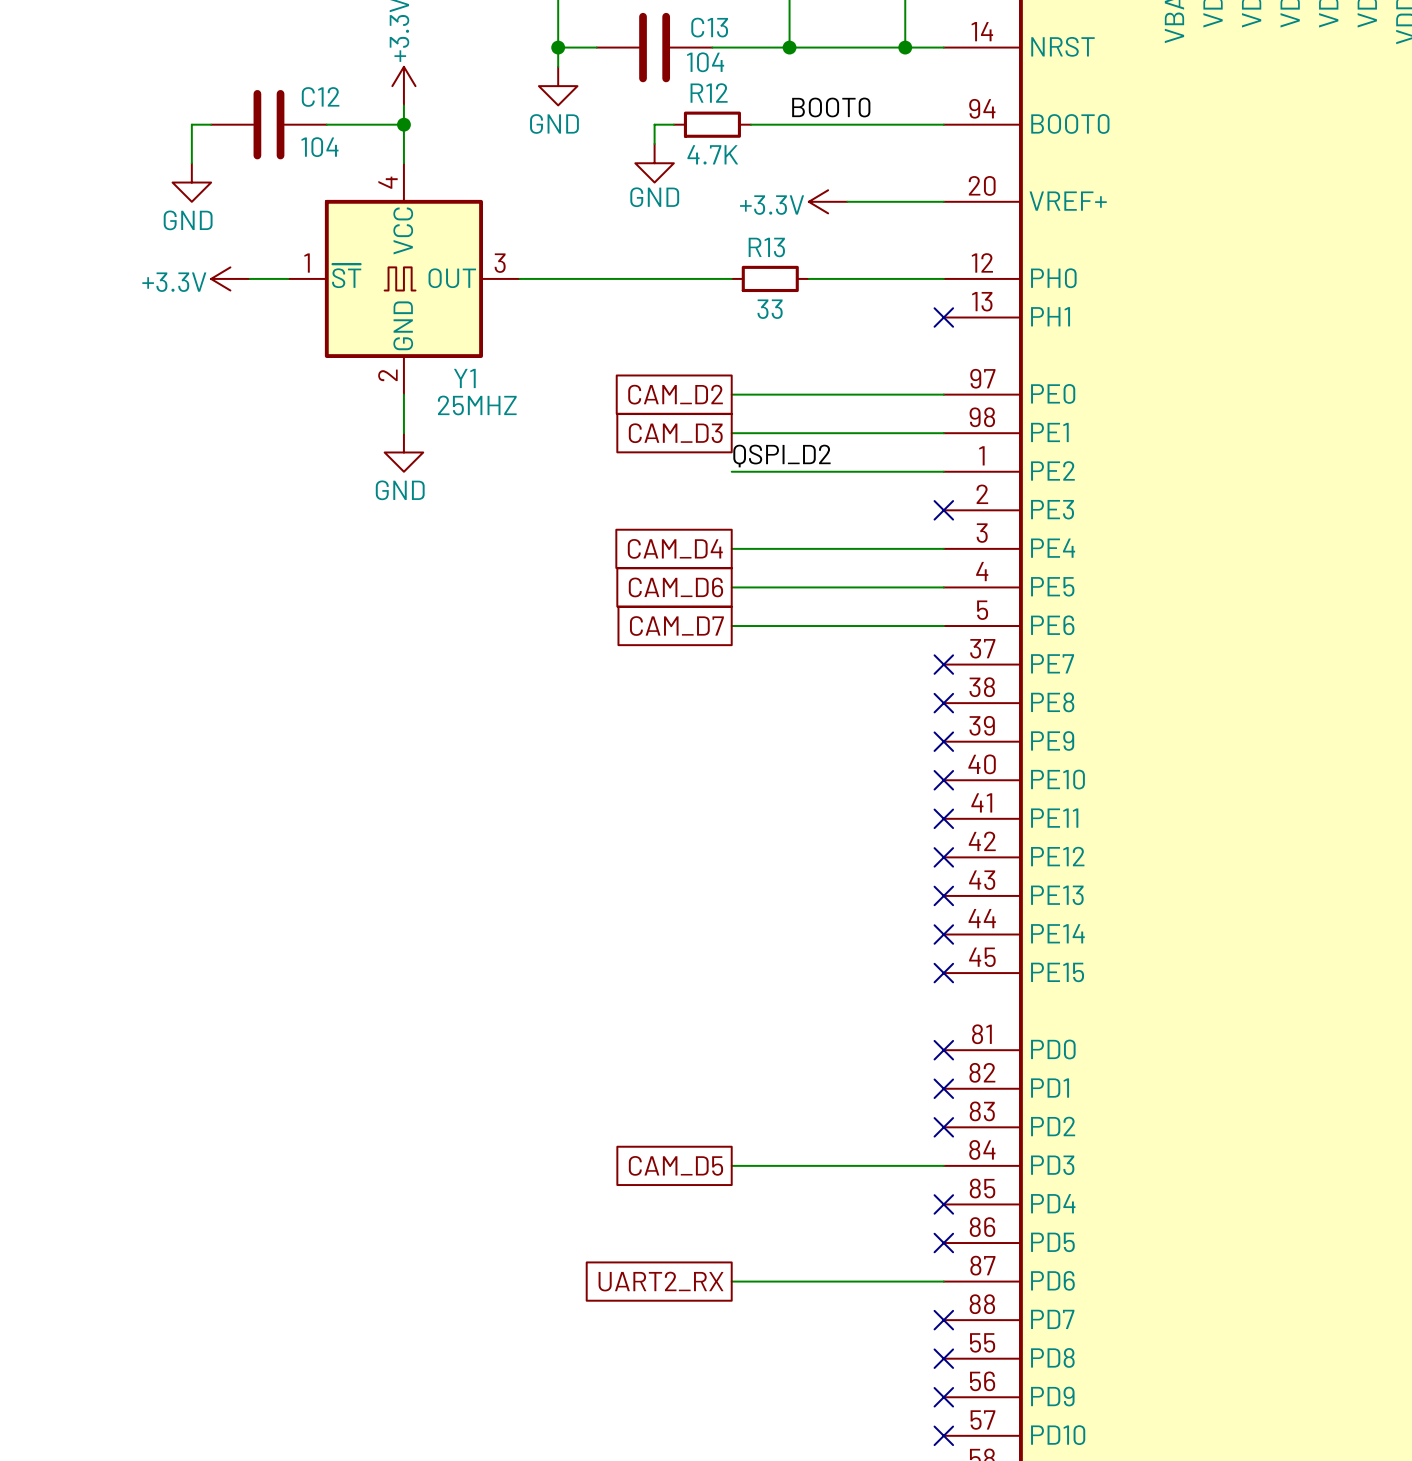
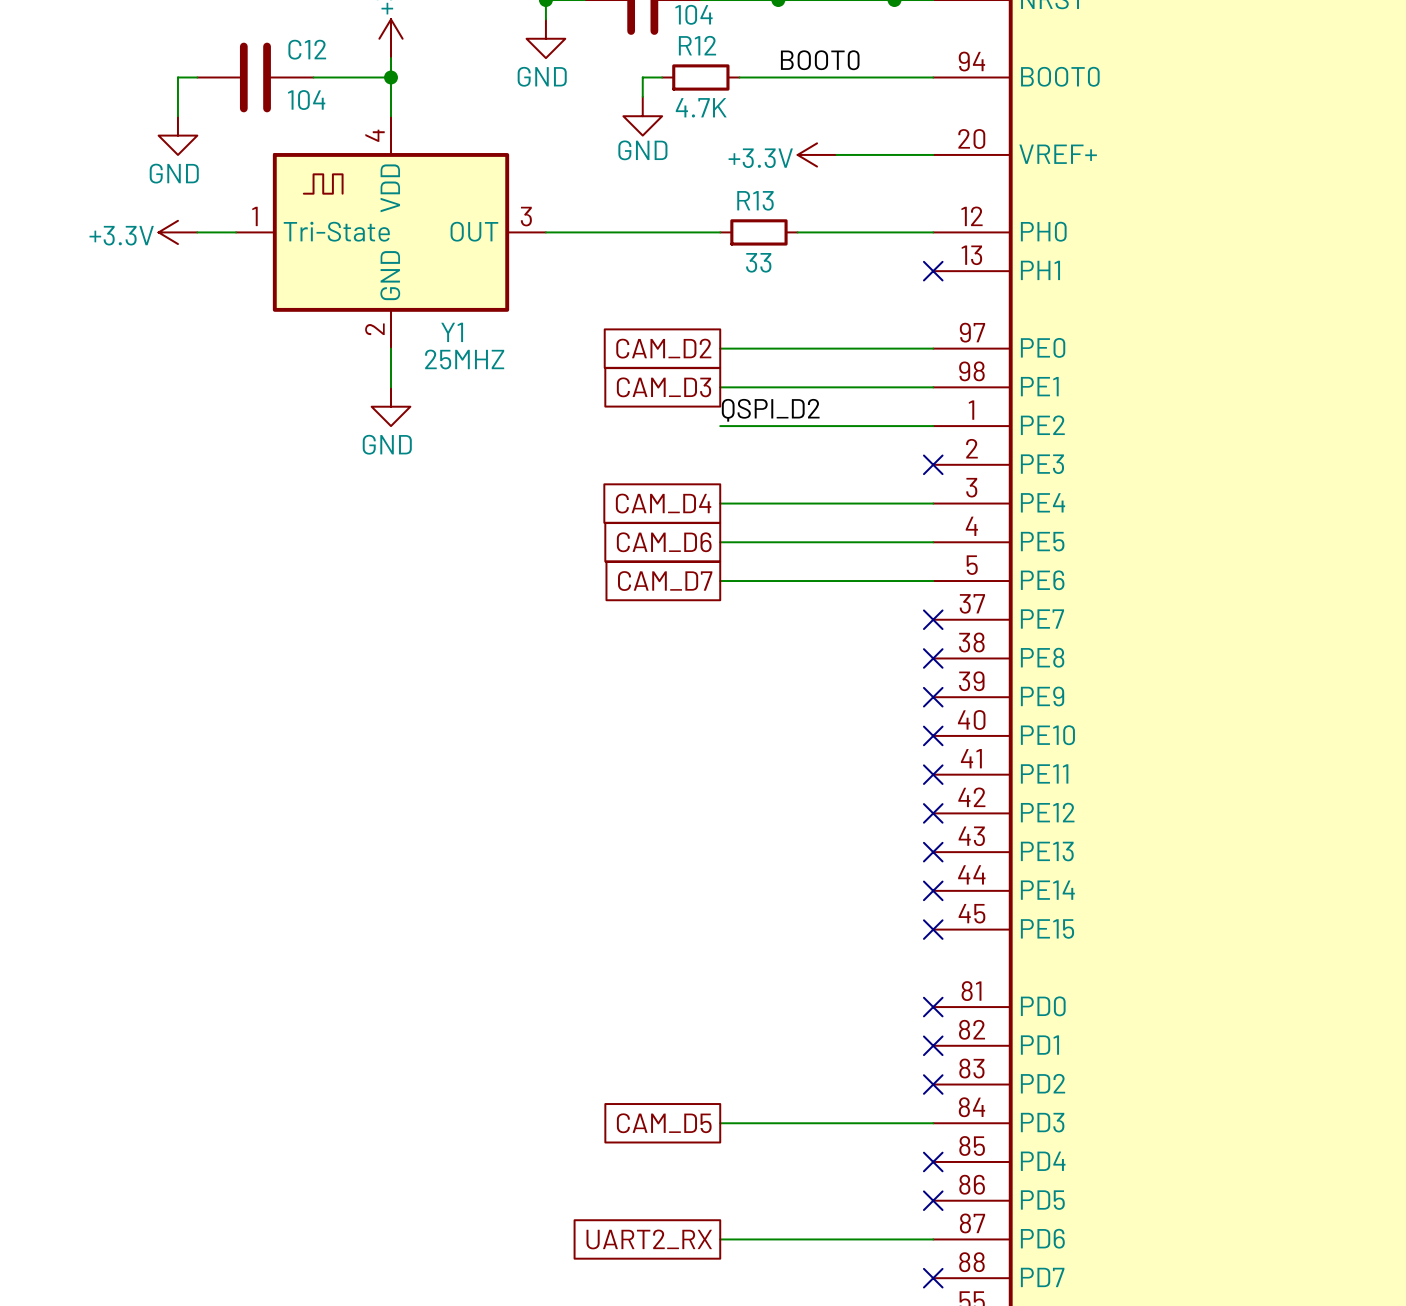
Y1 symbol: [288, 163, 520, 395] -> [236, 116, 546, 349]
power symbol position: +3.3V (230, 278) -> +3.3V (177, 232)

